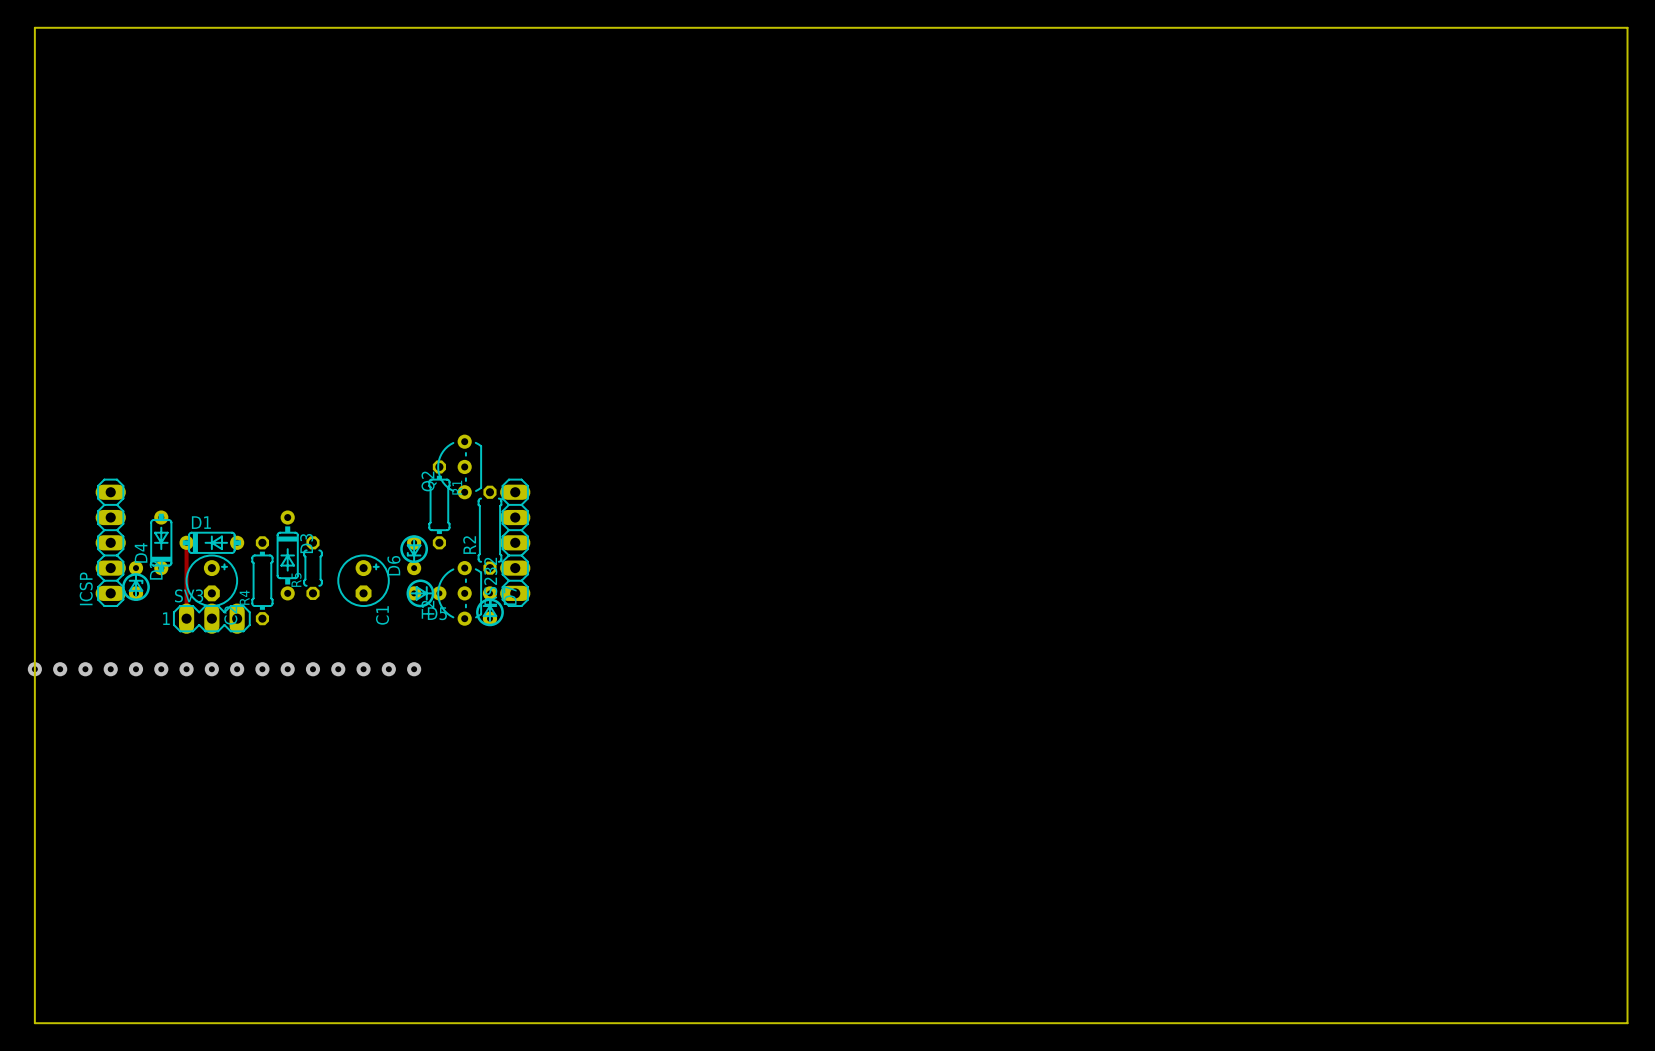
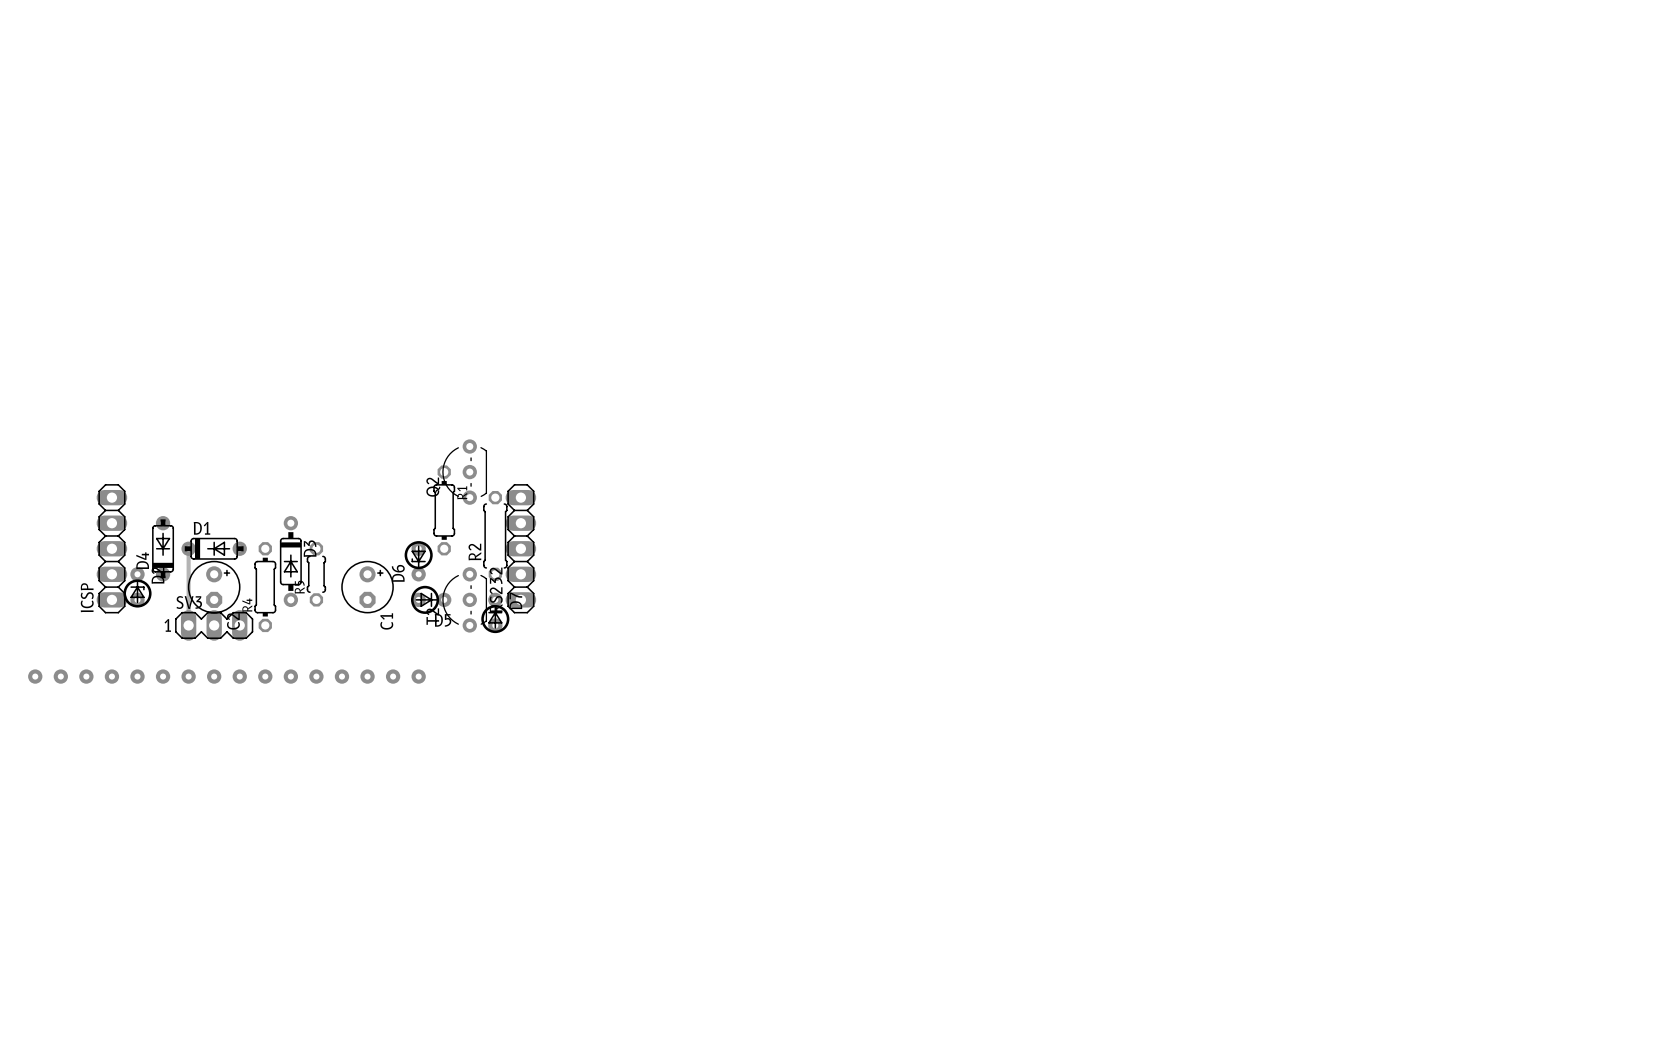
board edge: (34, 27) (1627, 27) (1627, 1023) (34, 1023) (34, 27) -> none

